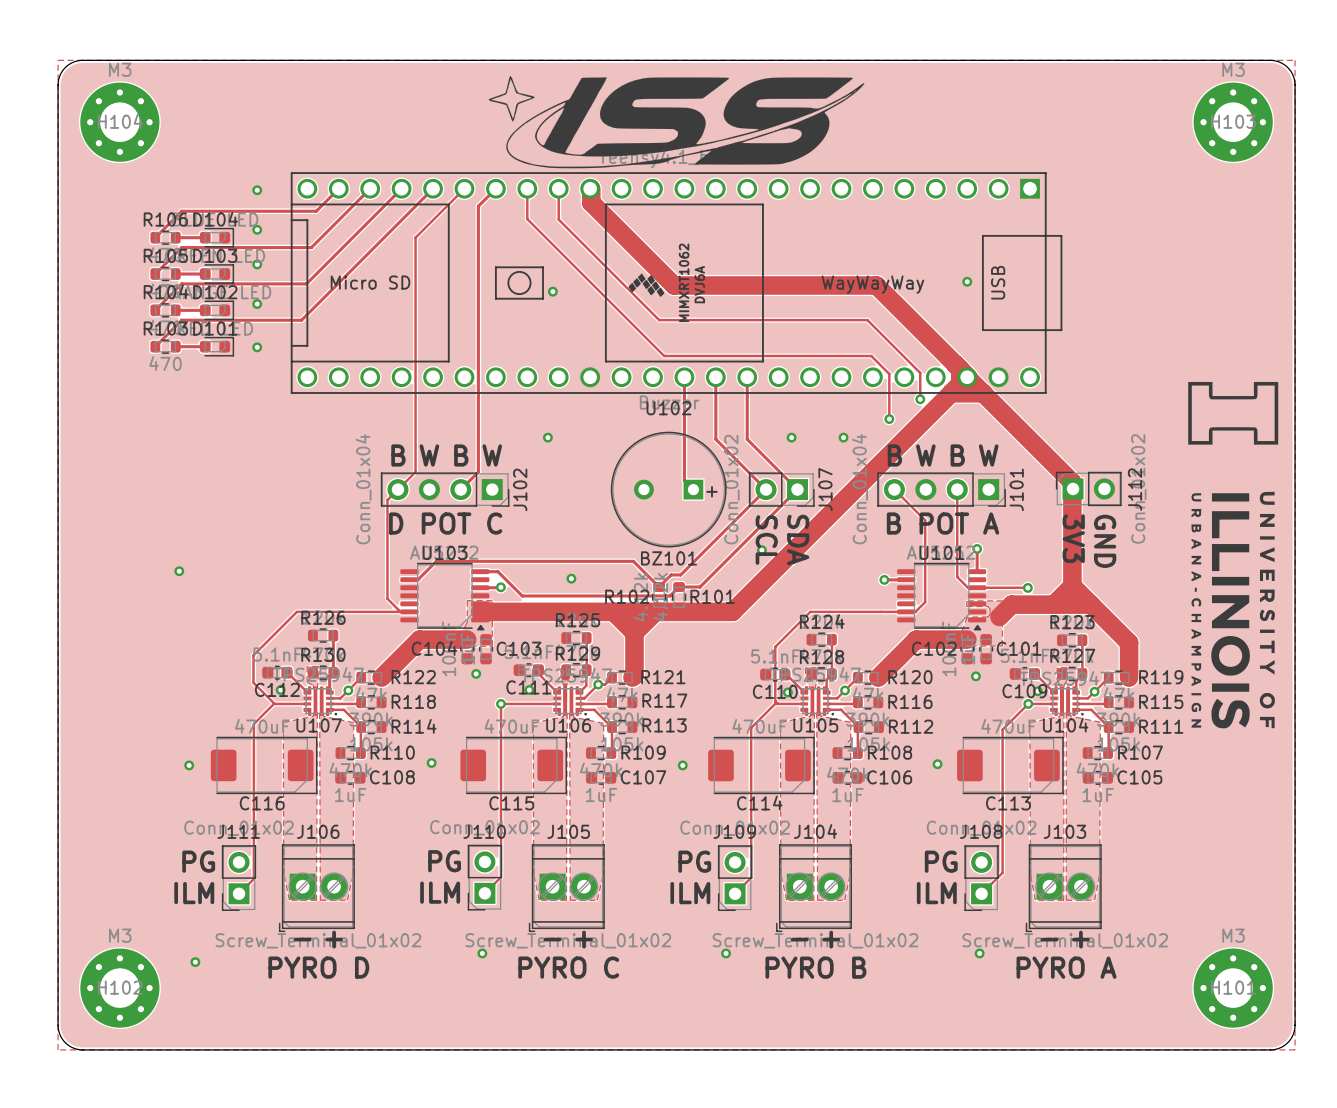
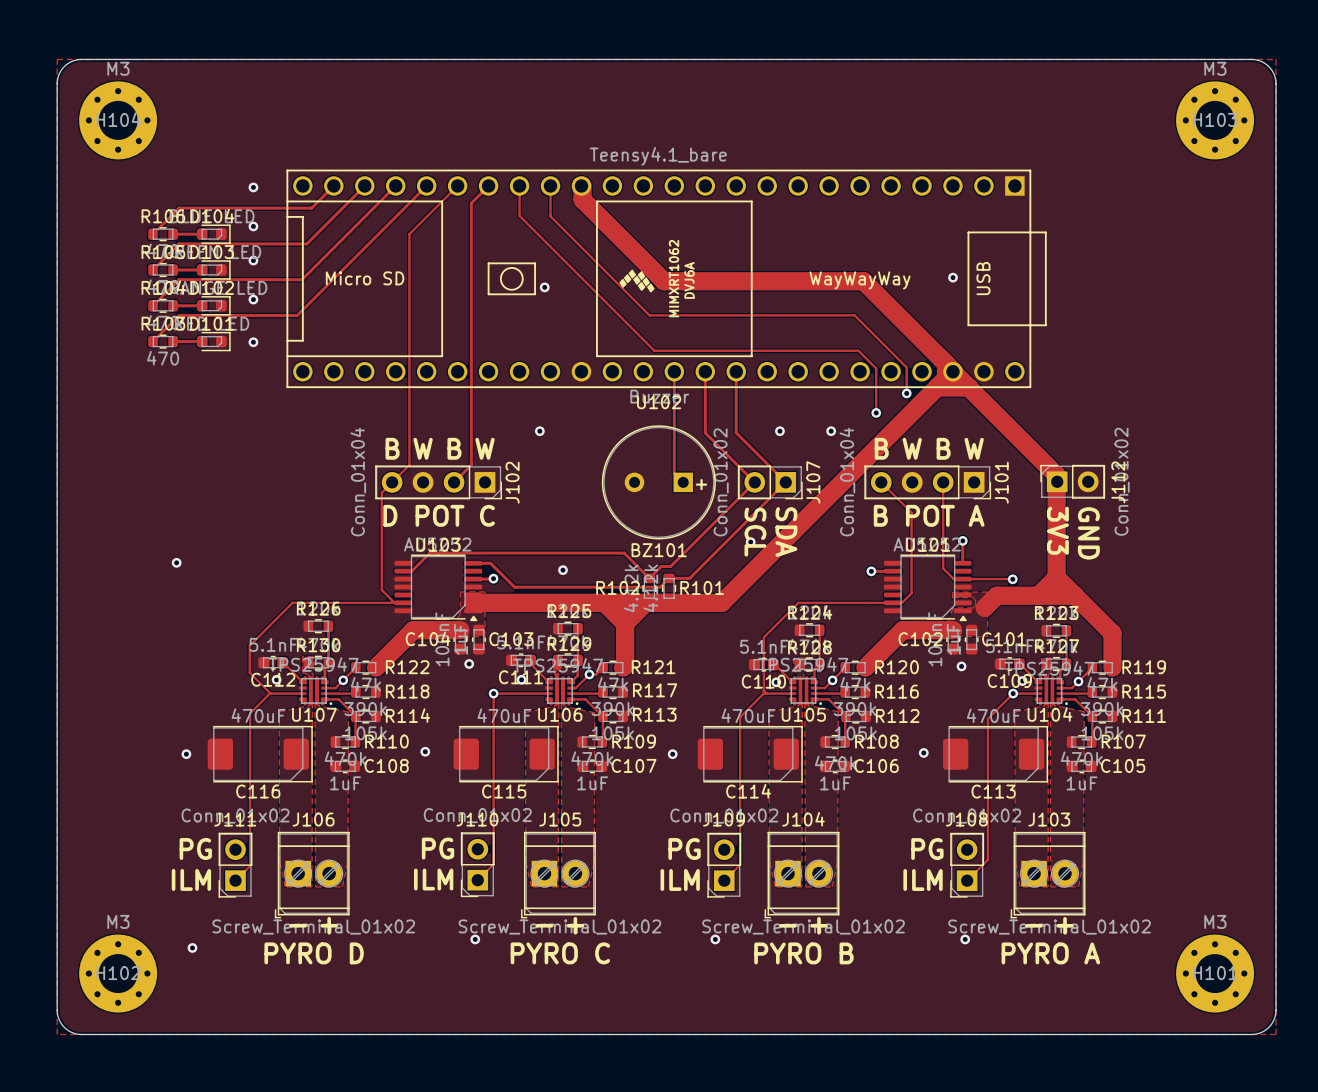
drawing: [488, 76, 865, 169] -> none
drawing: [1188, 381, 1279, 729] -> none

